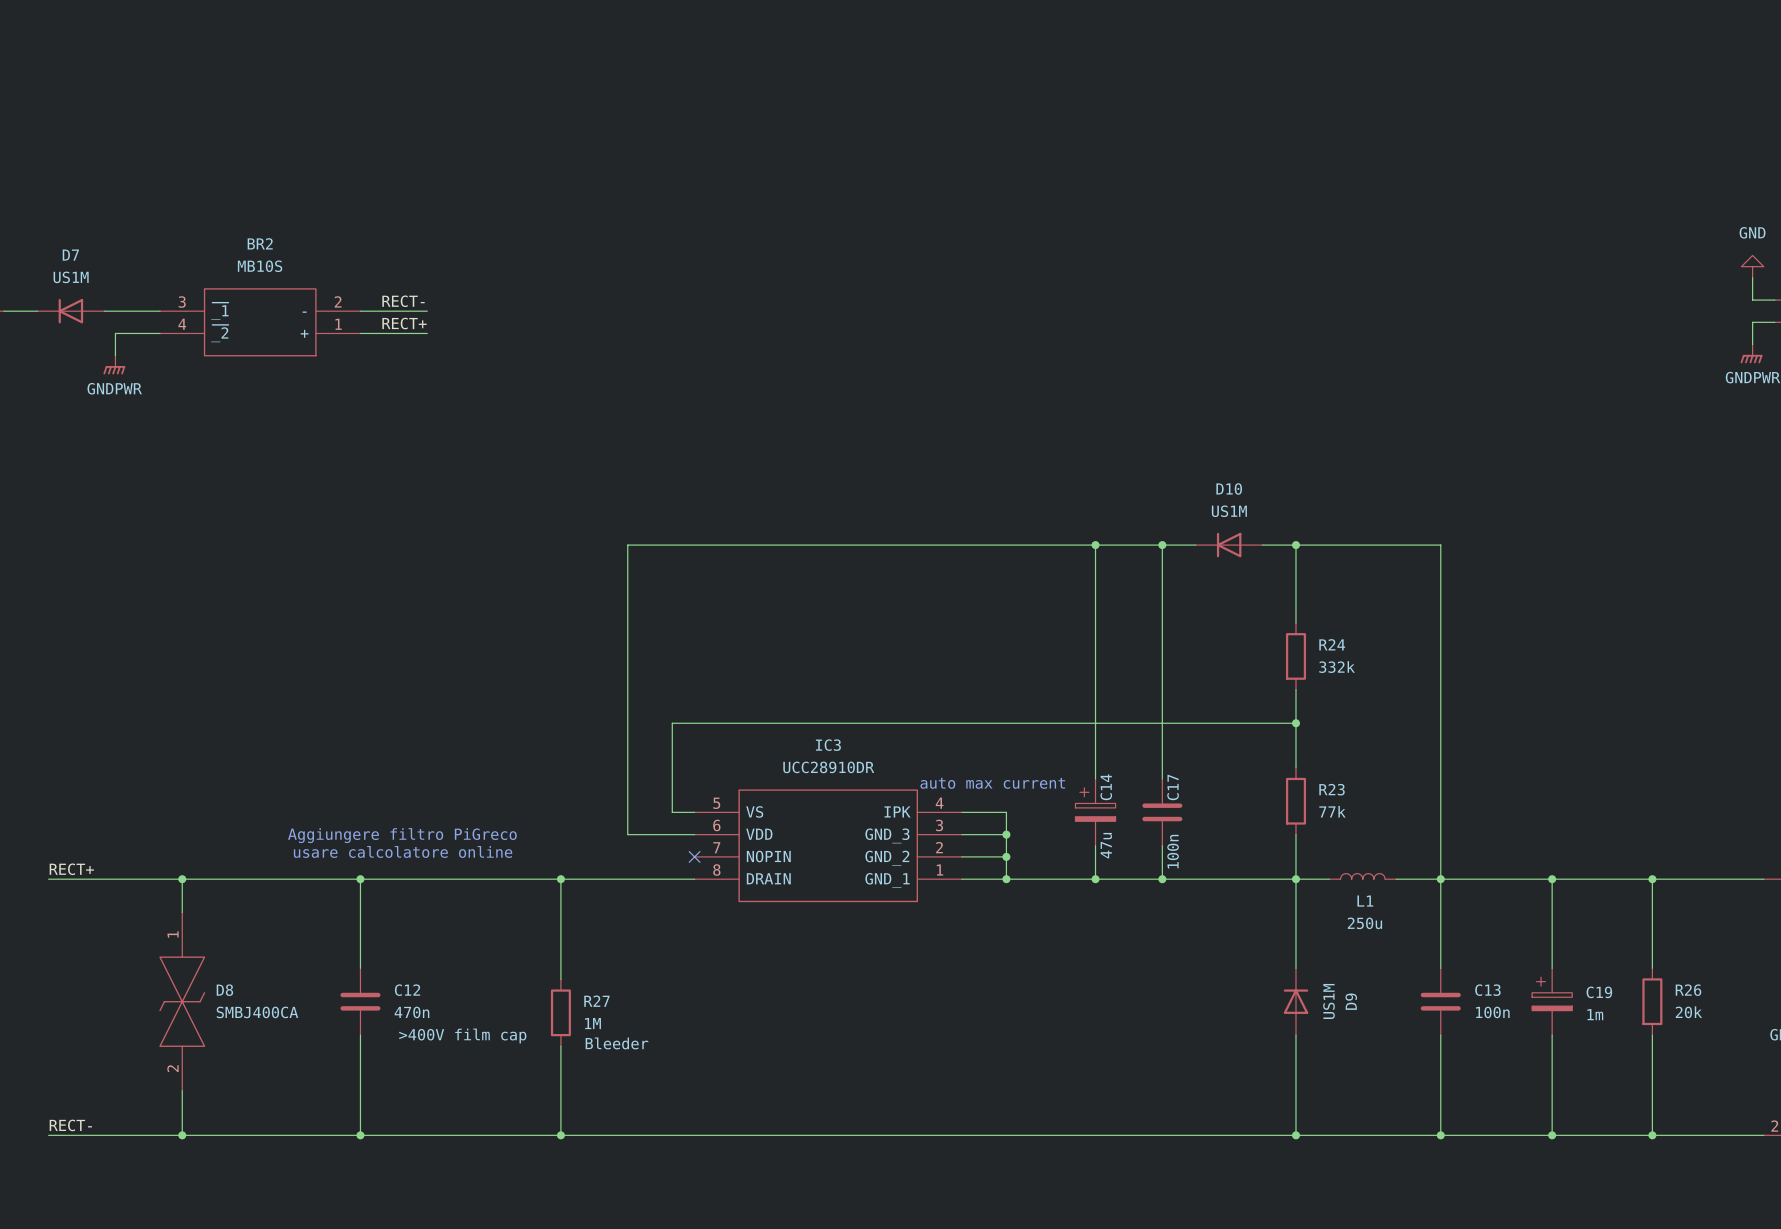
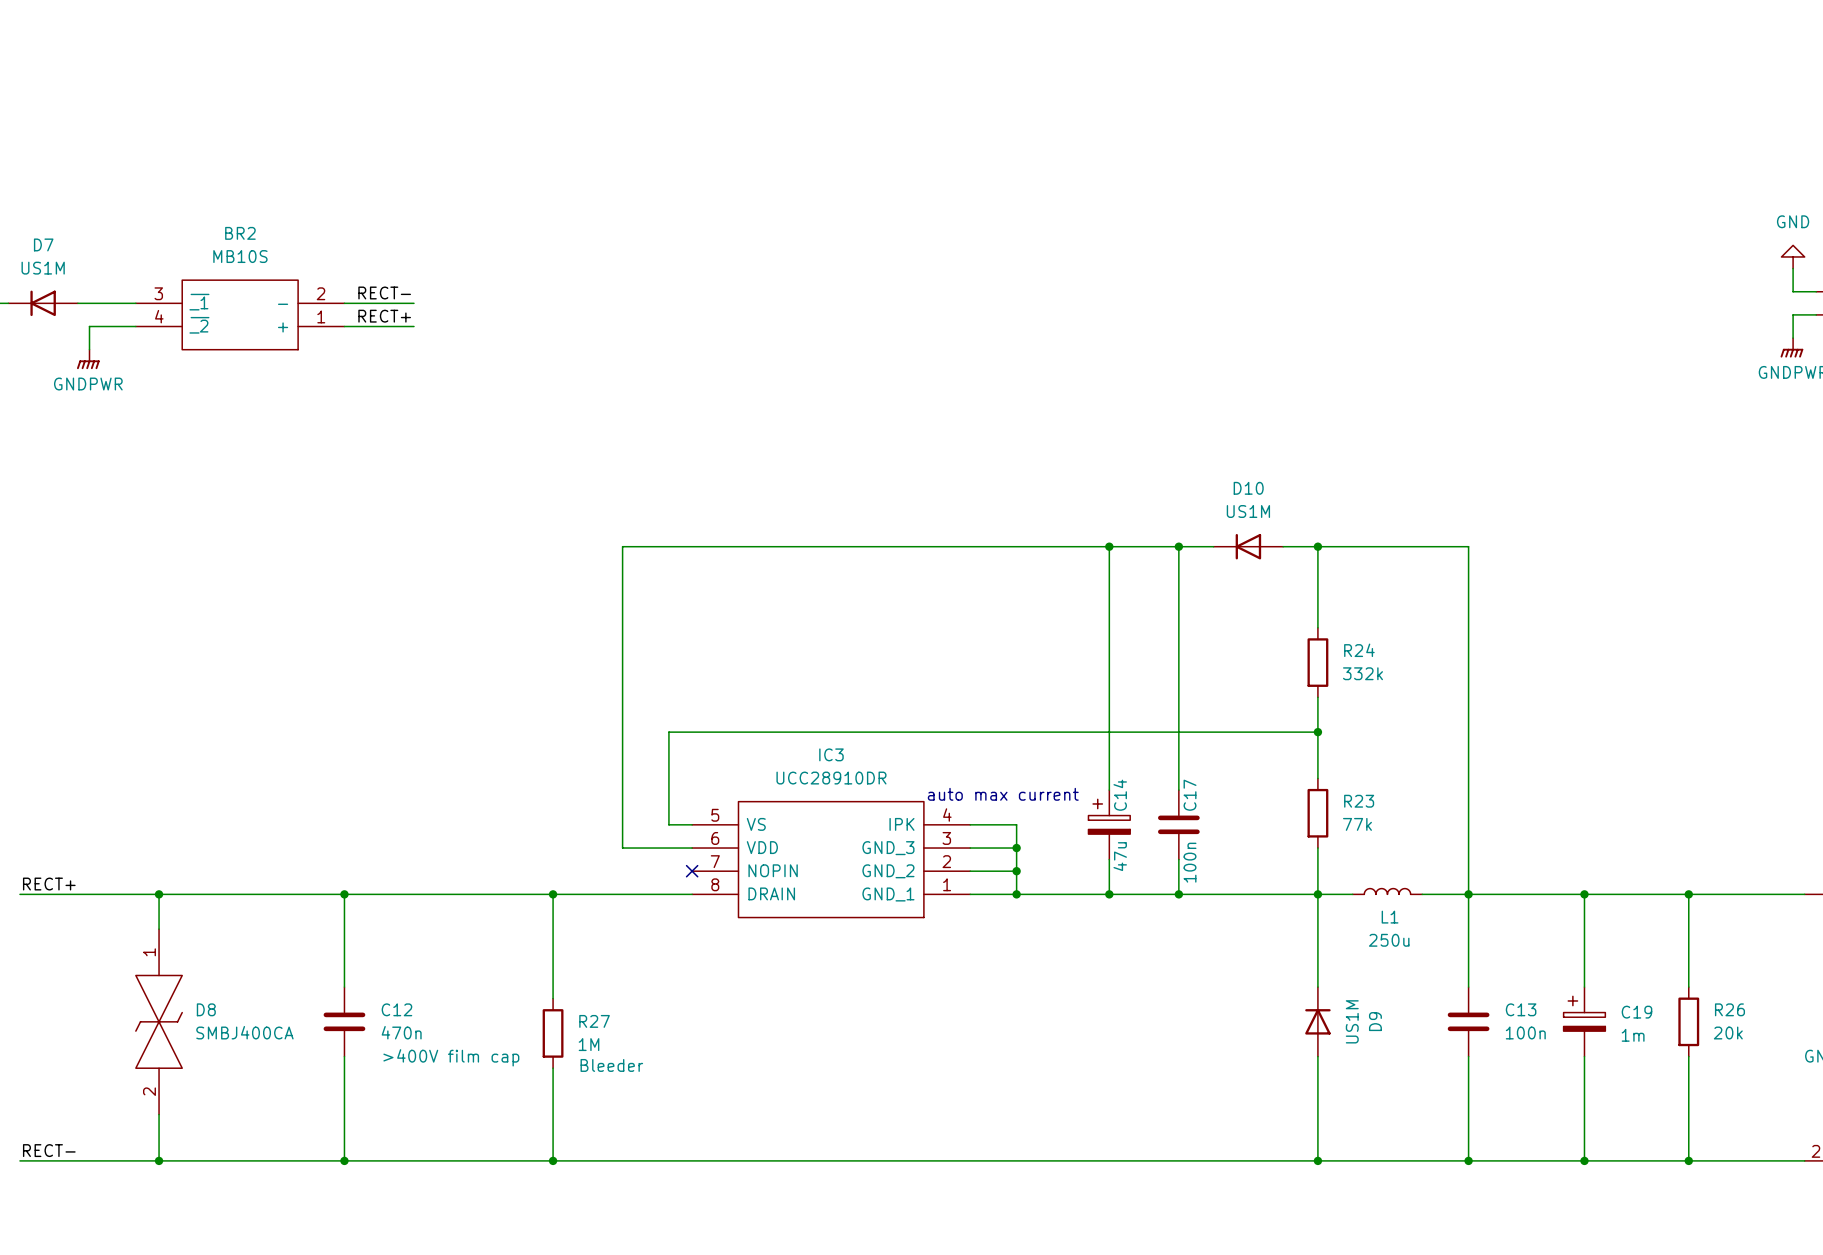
text: Aggiungere filtro PiGreco (402, 835) -> none
text: usare calcolatore online (403, 851) -> none

